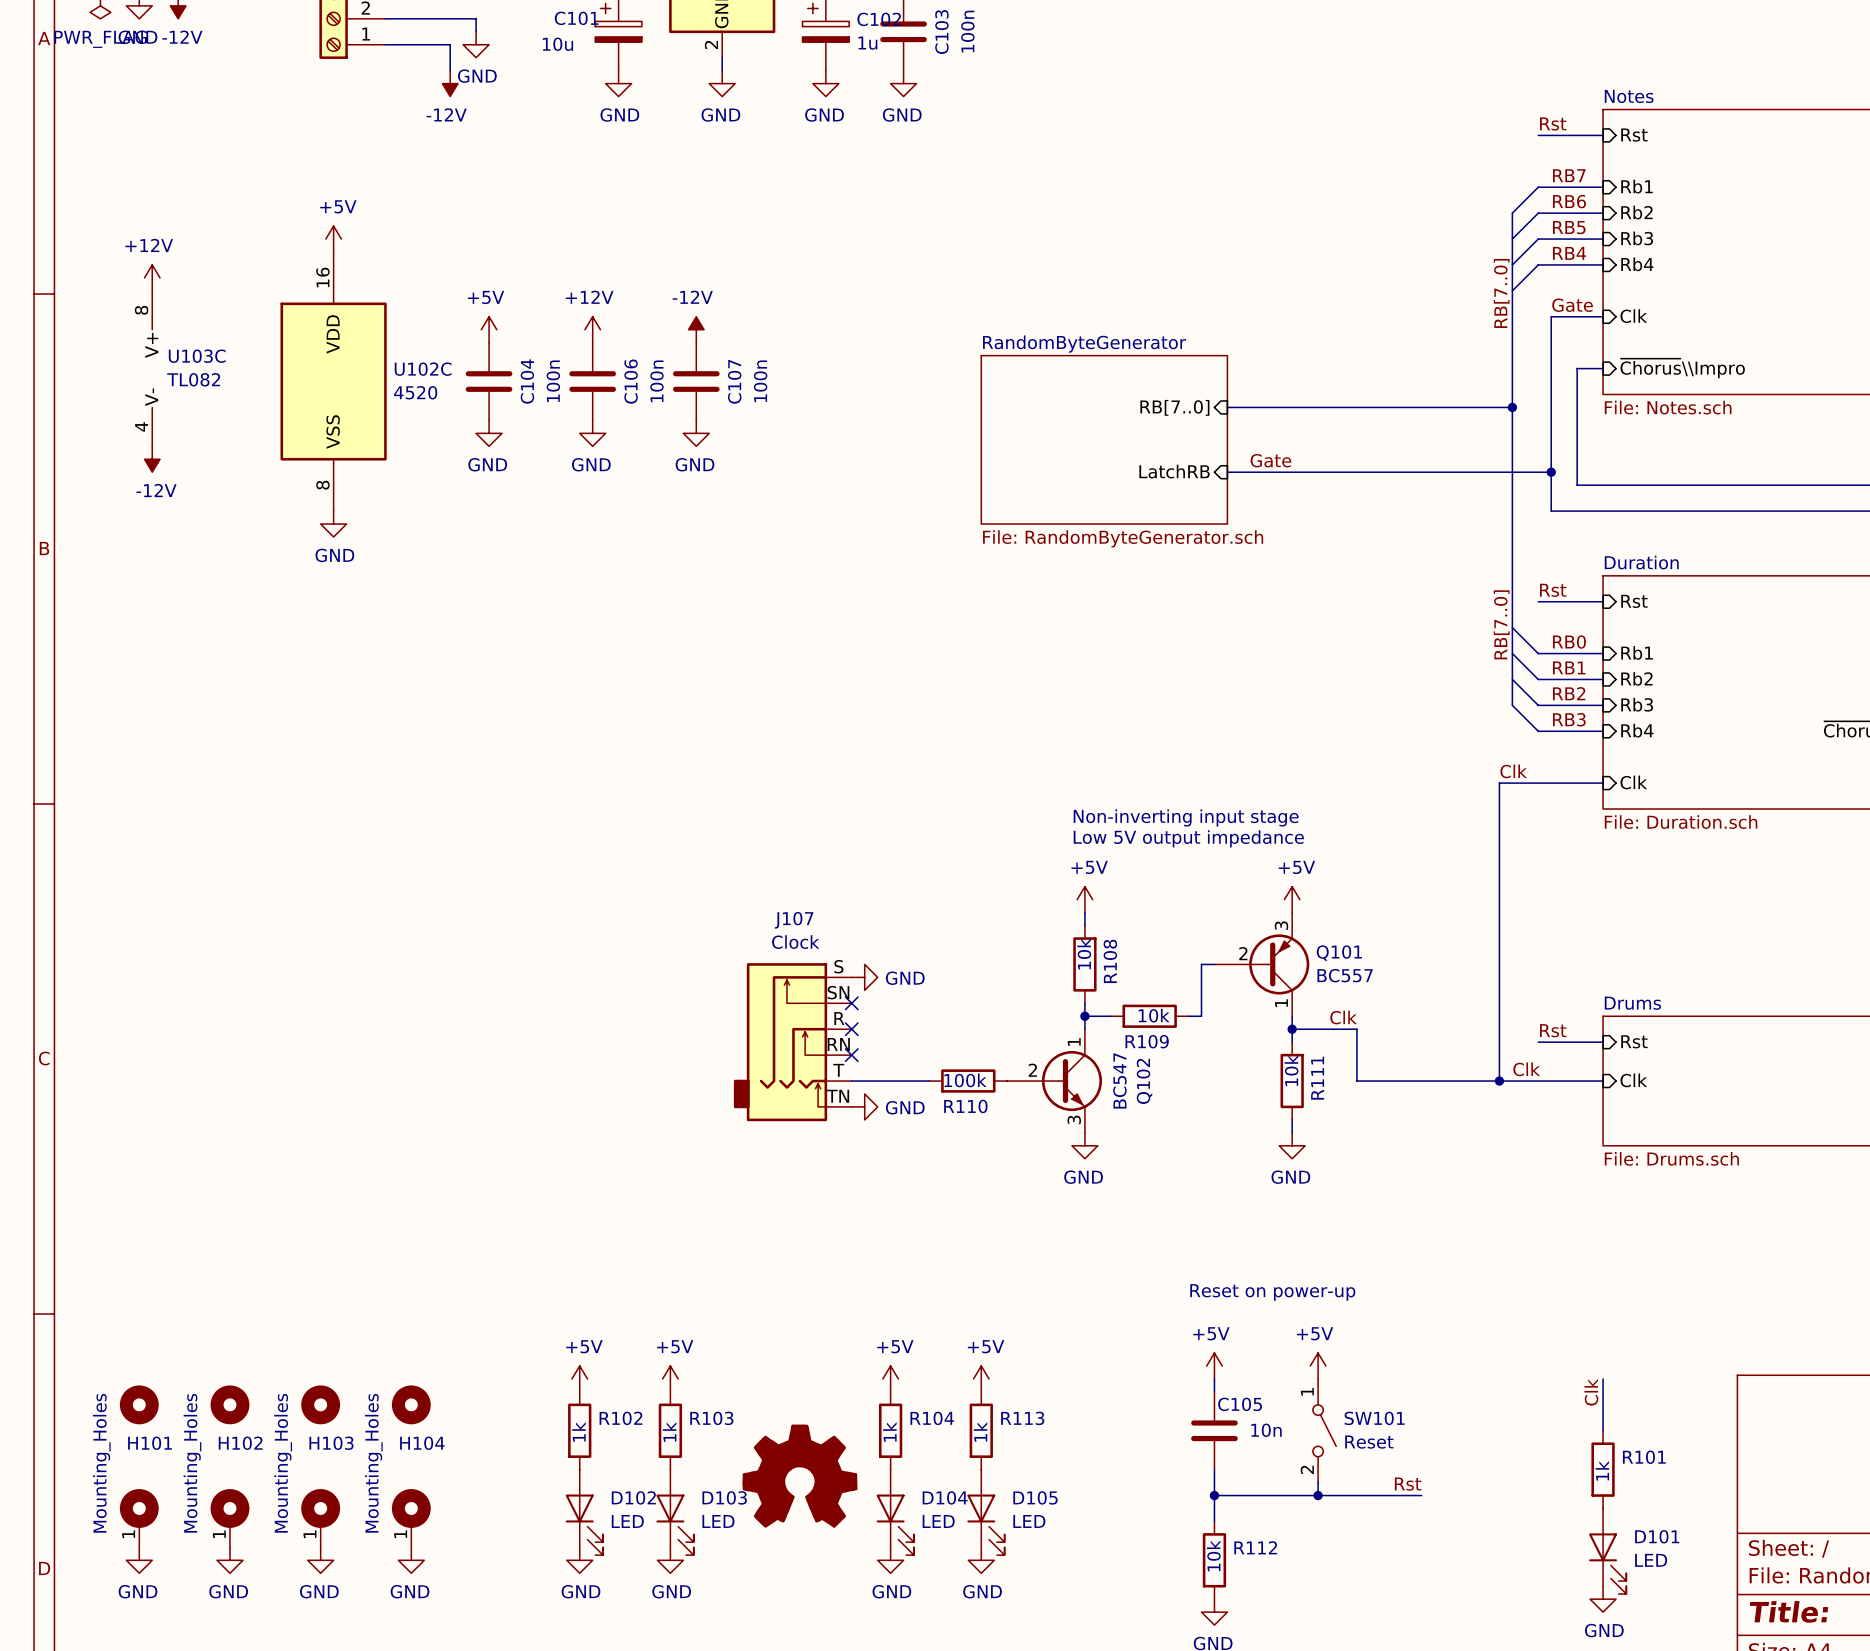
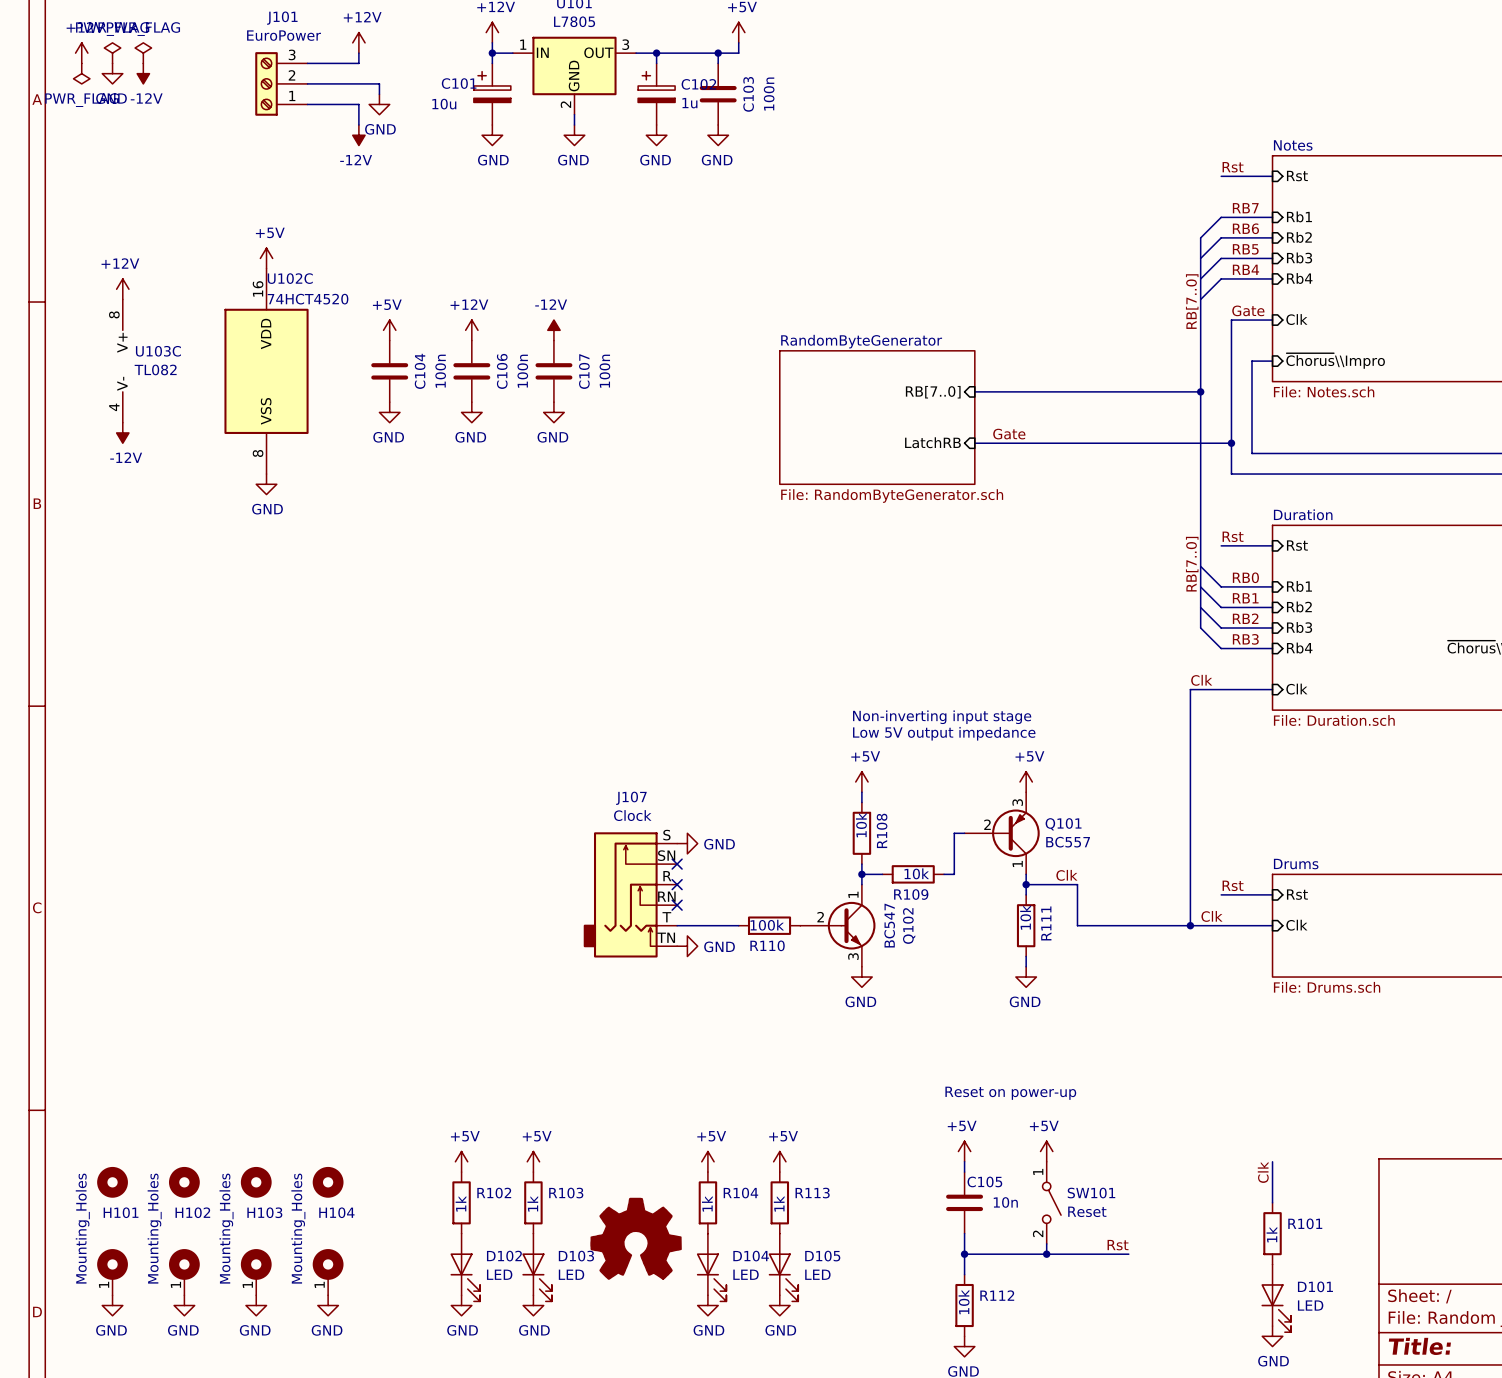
U102C name position: U102C (423, 369) -> U102C (290, 278)
U102C value: 4520 (415, 392) -> 74HCT4520 (308, 299)

